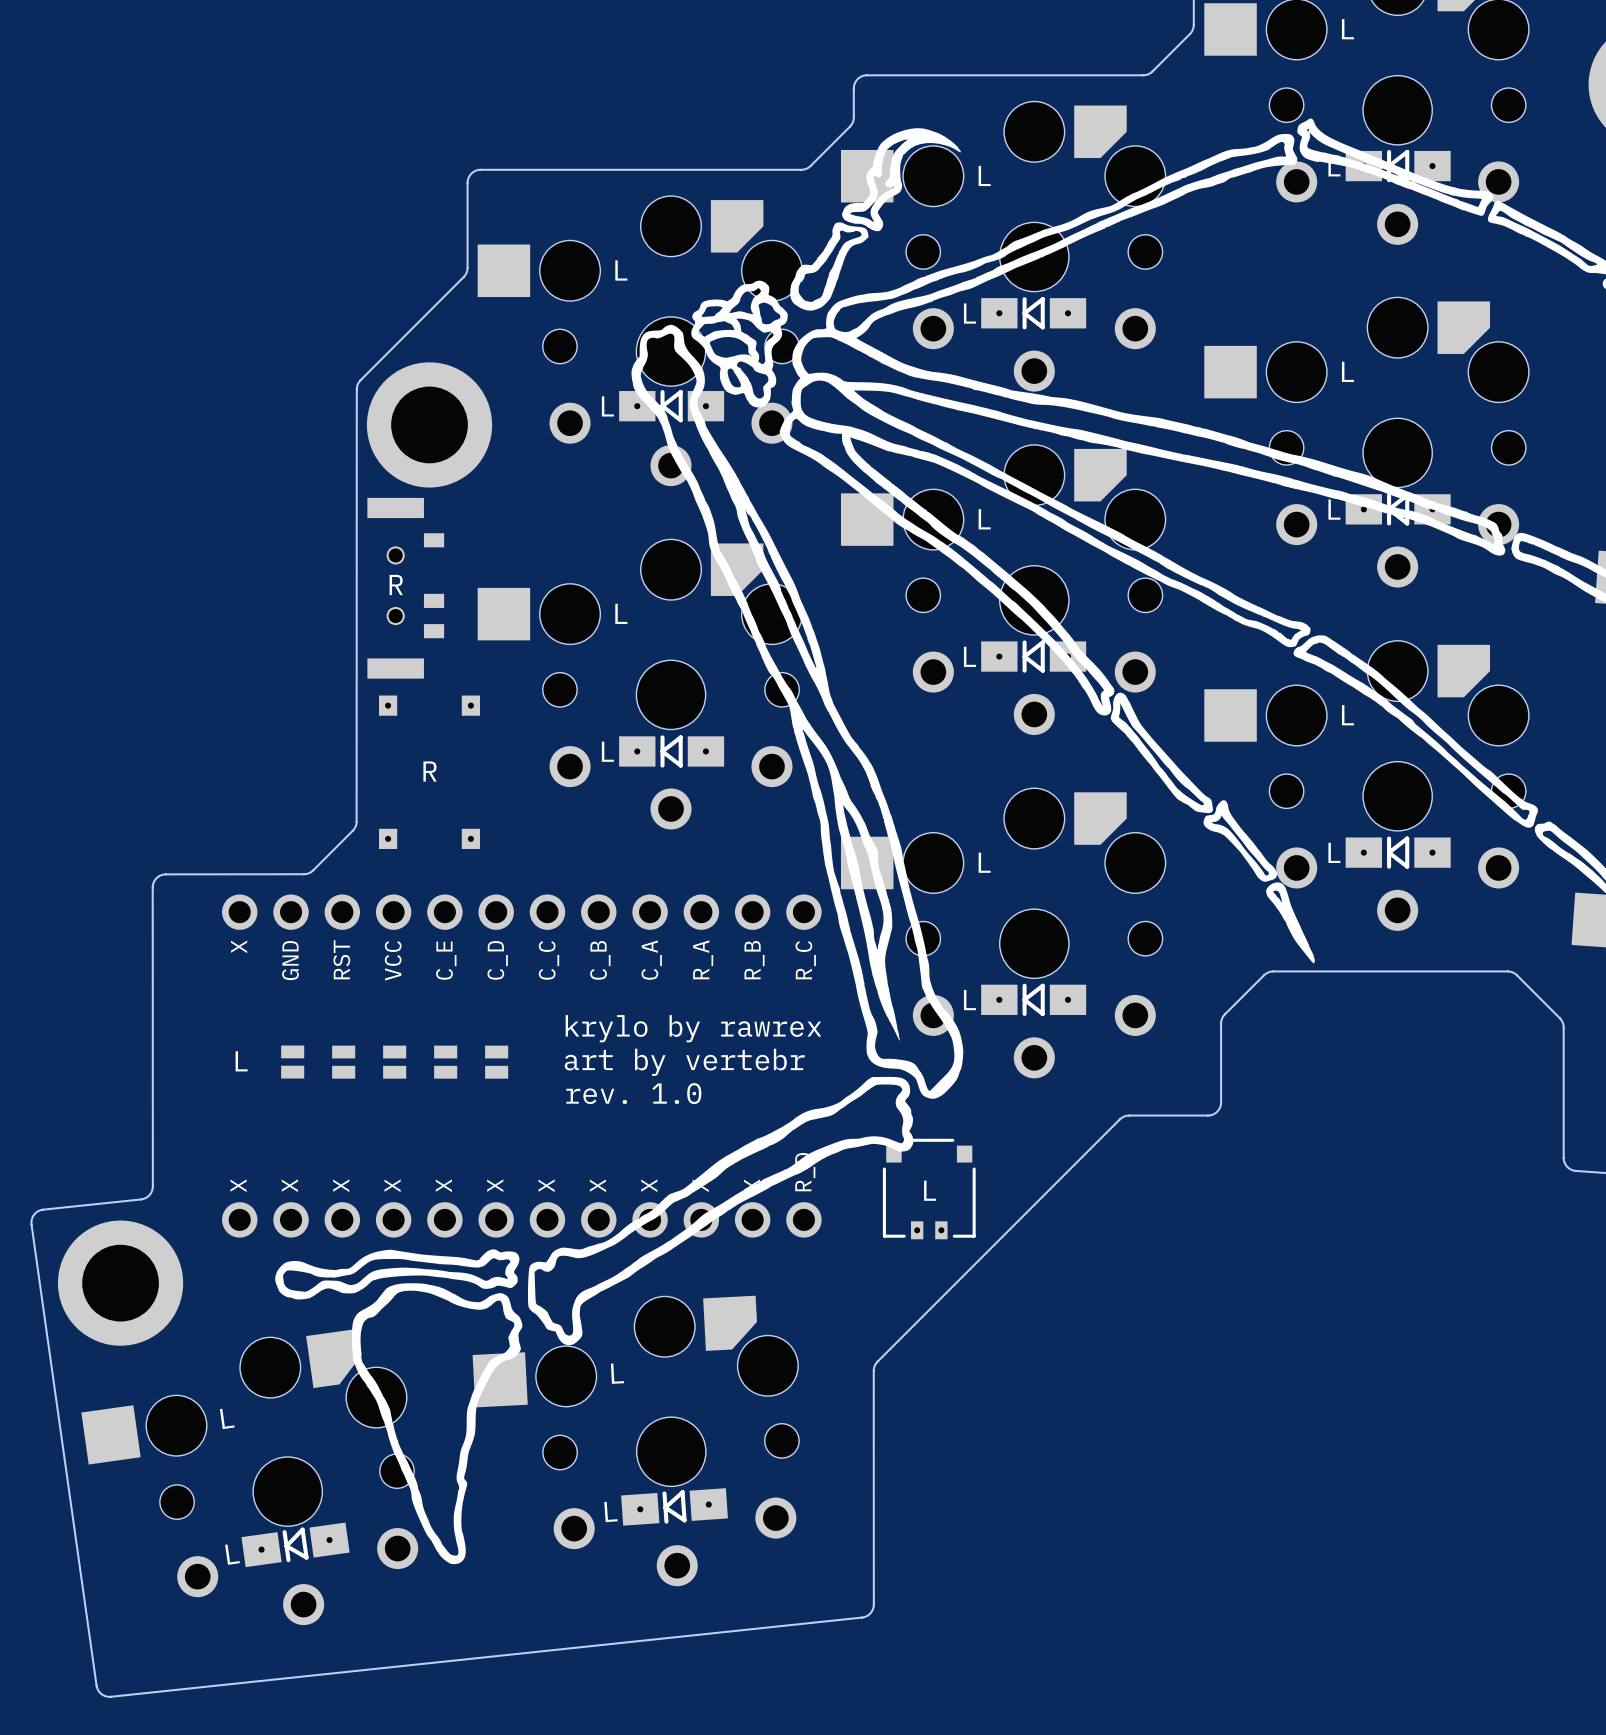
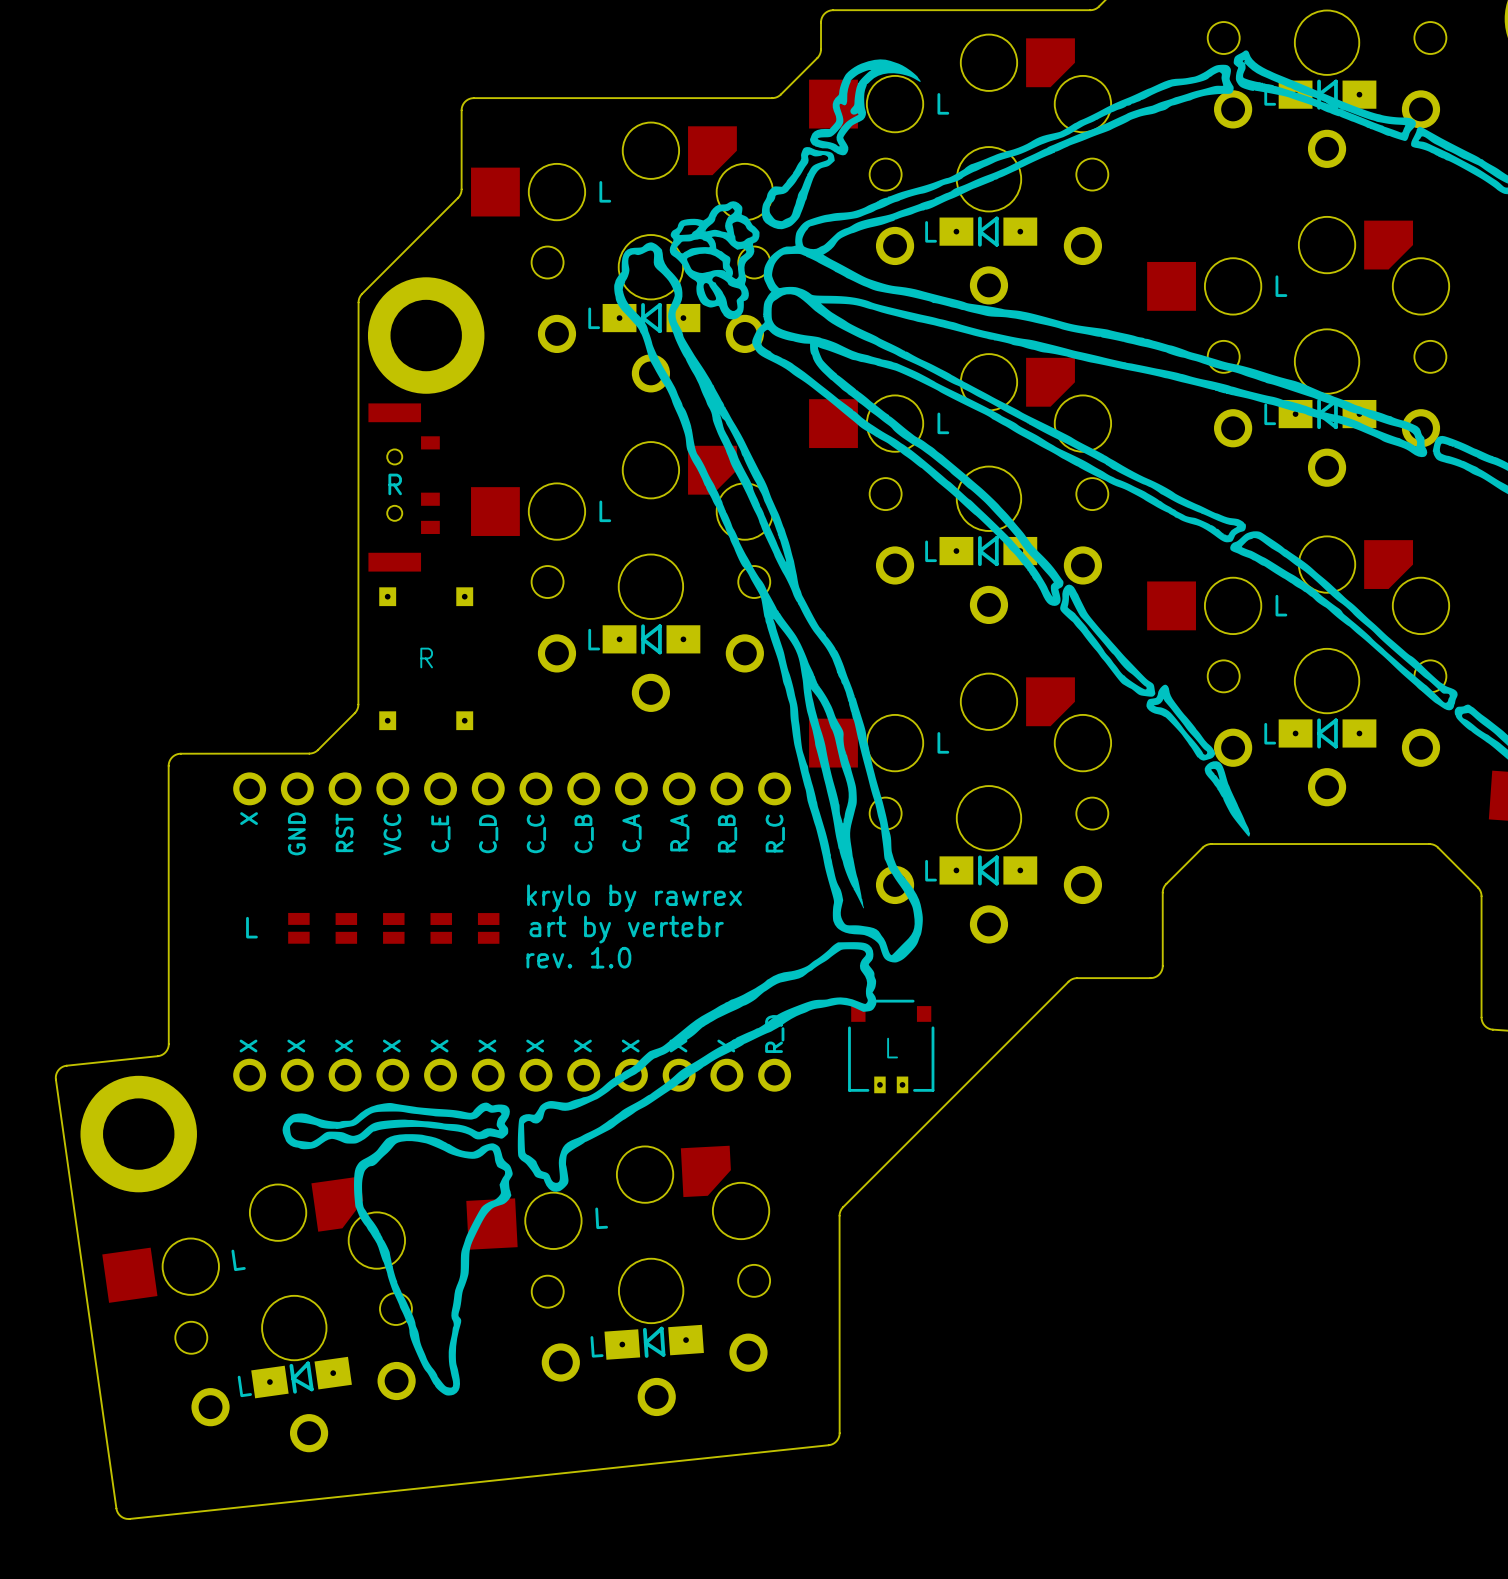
drawing position: (693, 1059) -> (634, 926)

